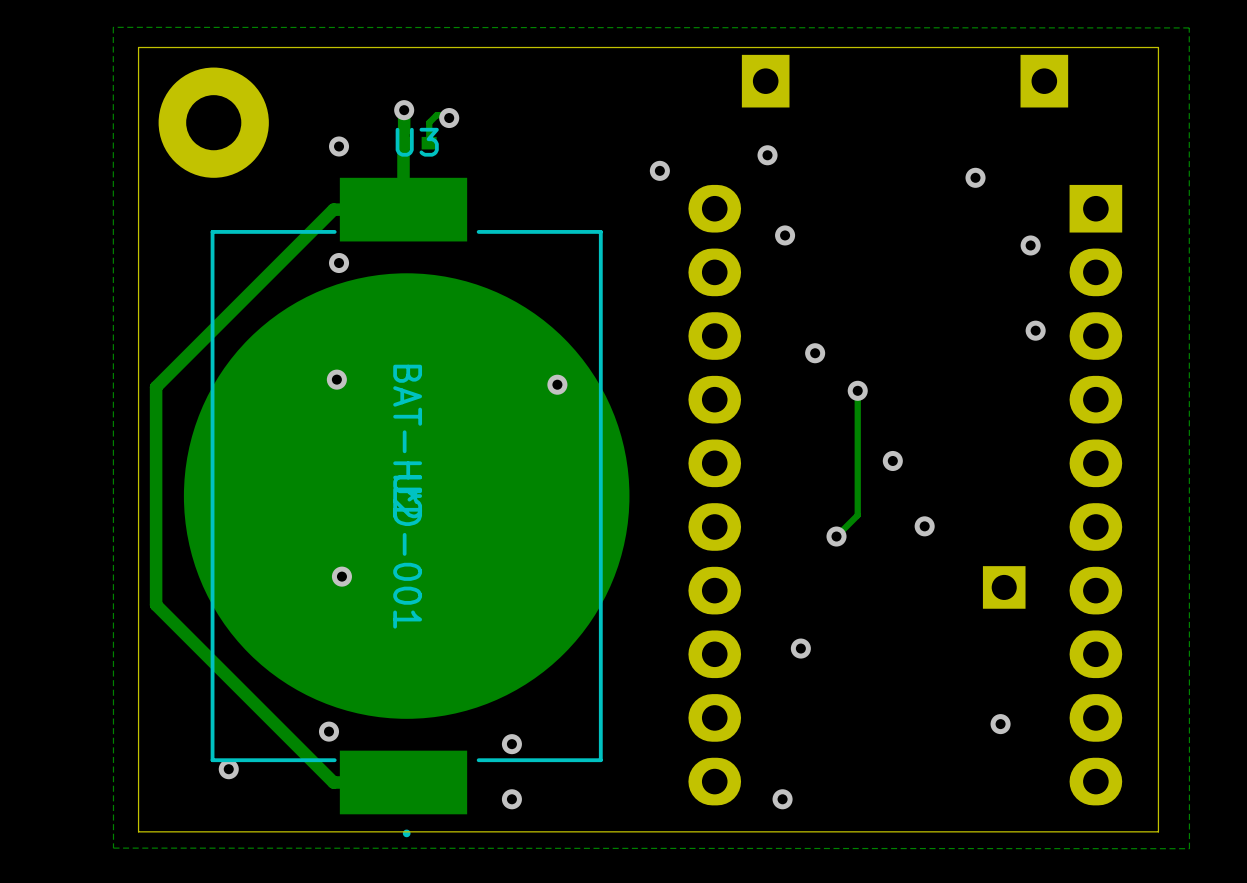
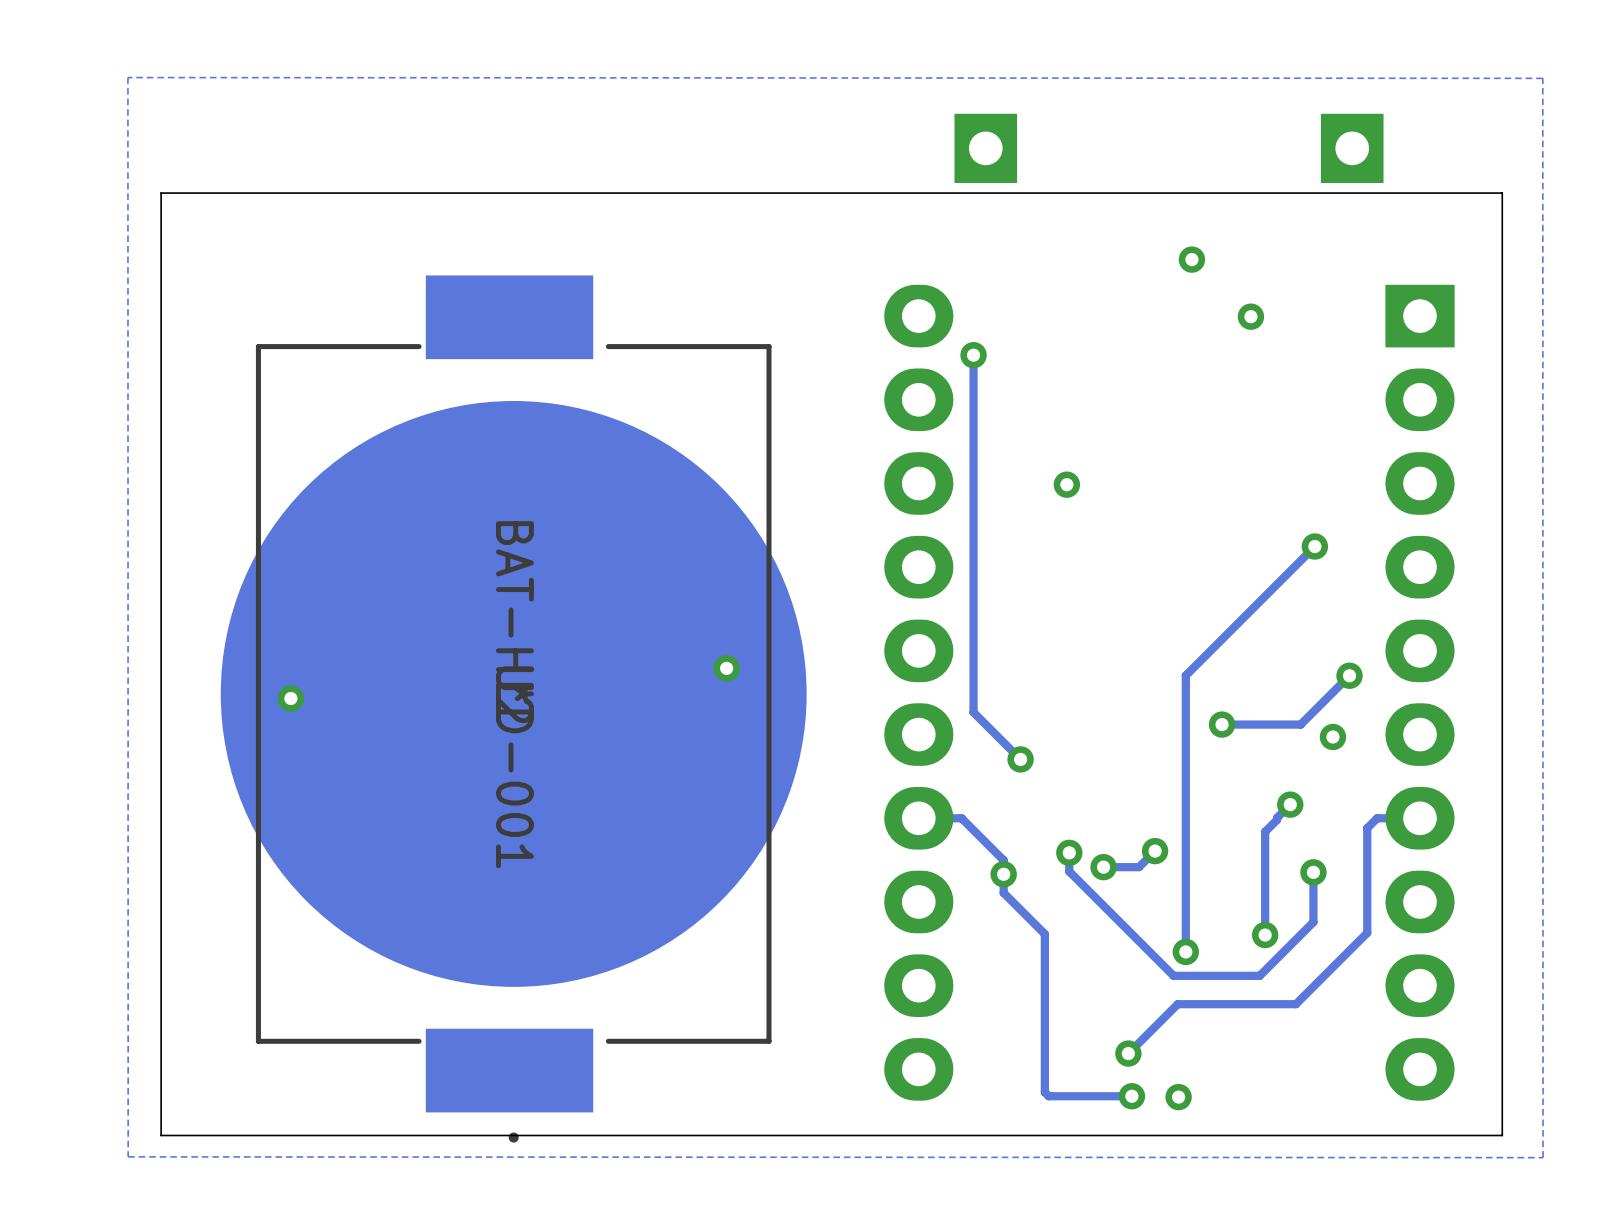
track: (404, 110) (403, 209) (333, 209) (156, 387) (156, 604) (333, 782) (403, 782) -> none
via: (404, 110) -> none
board edge: (1158, 115) (1158, 47) (138, 47) (138, 115) -> (1502, 193) (161, 193)
track: (449, 118) (446, 115) (436, 115) (429, 122) (429, 142) -> none
via: (449, 118) -> none
part: (213, 122) -> none
U3: (416, 143) -> none
via: (339, 146) -> none
via: (767, 155) -> none
via: none -> (1191, 259)
via: (659, 170) -> none
via: (975, 177) -> none
via: none -> (1250, 316)
via position: (785, 235) -> (973, 355)
track: none -> (973, 355) (973, 712) (1020, 759)
via: (1030, 245) -> none
via: (339, 263) -> none
via position: (1035, 330) -> (1314, 546)
via position: (815, 353) -> (1066, 484)
via: (336, 379) -> none
track: none -> (1314, 546) (1185, 675) (1185, 951)
via position: (557, 384) -> (726, 668)
track: (857, 390) (857, 515) (836, 536) -> none
via: (857, 390) -> none
via: (892, 460) -> none
track: none -> (1349, 675) (1300, 724) (1222, 724)
via: none -> (1349, 675)
via: none -> (290, 698)
via position: (924, 526) -> (1222, 724)
via: none -> (1332, 737)
via: (836, 536) -> none
via: none -> (1020, 759)
via: (341, 576) -> none
track: none -> (1290, 804) (1265, 831) (1265, 935)
via: none -> (1290, 804)
part: (1004, 587) -> none
track: none -> (918, 818) (961, 818) (1003, 860) (1003, 892) (1044, 934) (1044, 1092) (1048, 1096) (1131, 1096)
track: none -> (1420, 818) (1377, 818) (1367, 828) (1367, 932) (1295, 1004) (1177, 1004) (1128, 1053)
track: none -> (1155, 851) (1139, 867) (1103, 867)
via: none -> (1155, 851)
track: none -> (1069, 852) (1069, 871) (1173, 975) (1259, 975) (1313, 922) (1313, 872)
via: none -> (1069, 852)
via: none -> (1103, 867)
via: none -> (1313, 872)
via: none -> (1003, 874)
via: (800, 648) -> none
via: none -> (1265, 935)
via: none -> (1185, 951)
via: (1000, 724) -> none
via: (329, 731) -> none
via: (511, 744) -> none
via: (228, 769) -> none
via: none -> (1128, 1053)
via: (511, 799) -> none
via: (782, 799) -> none
via: none -> (1131, 1096)
via: none -> (1178, 1097)

